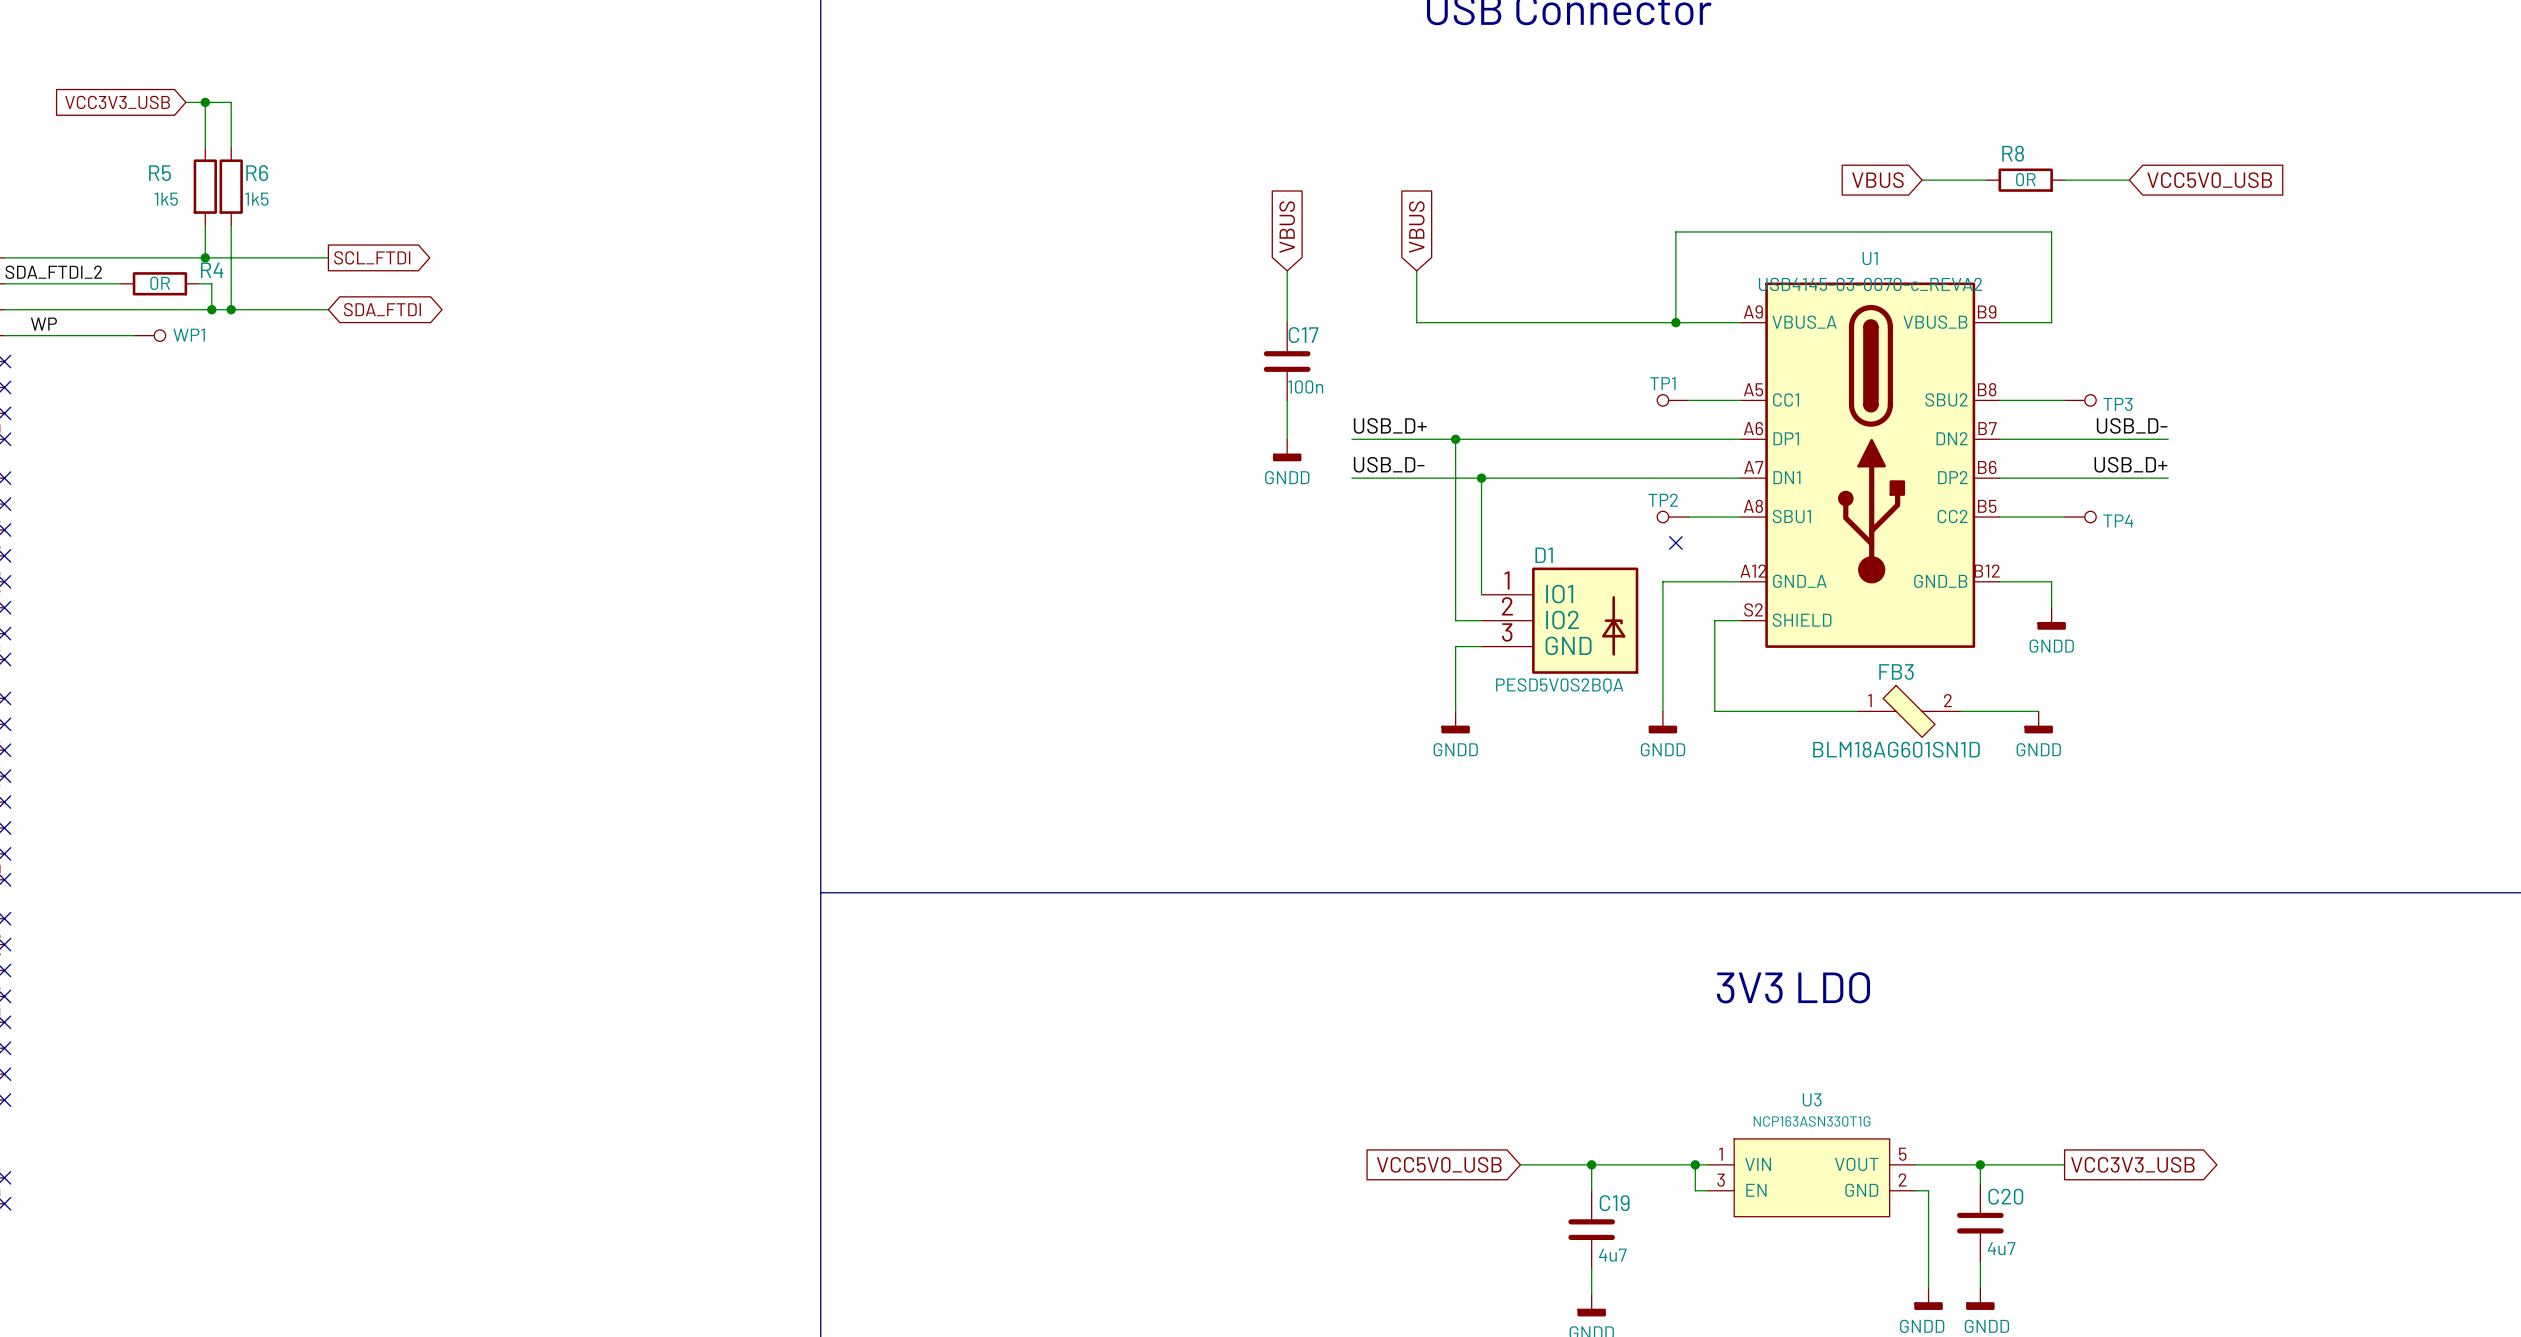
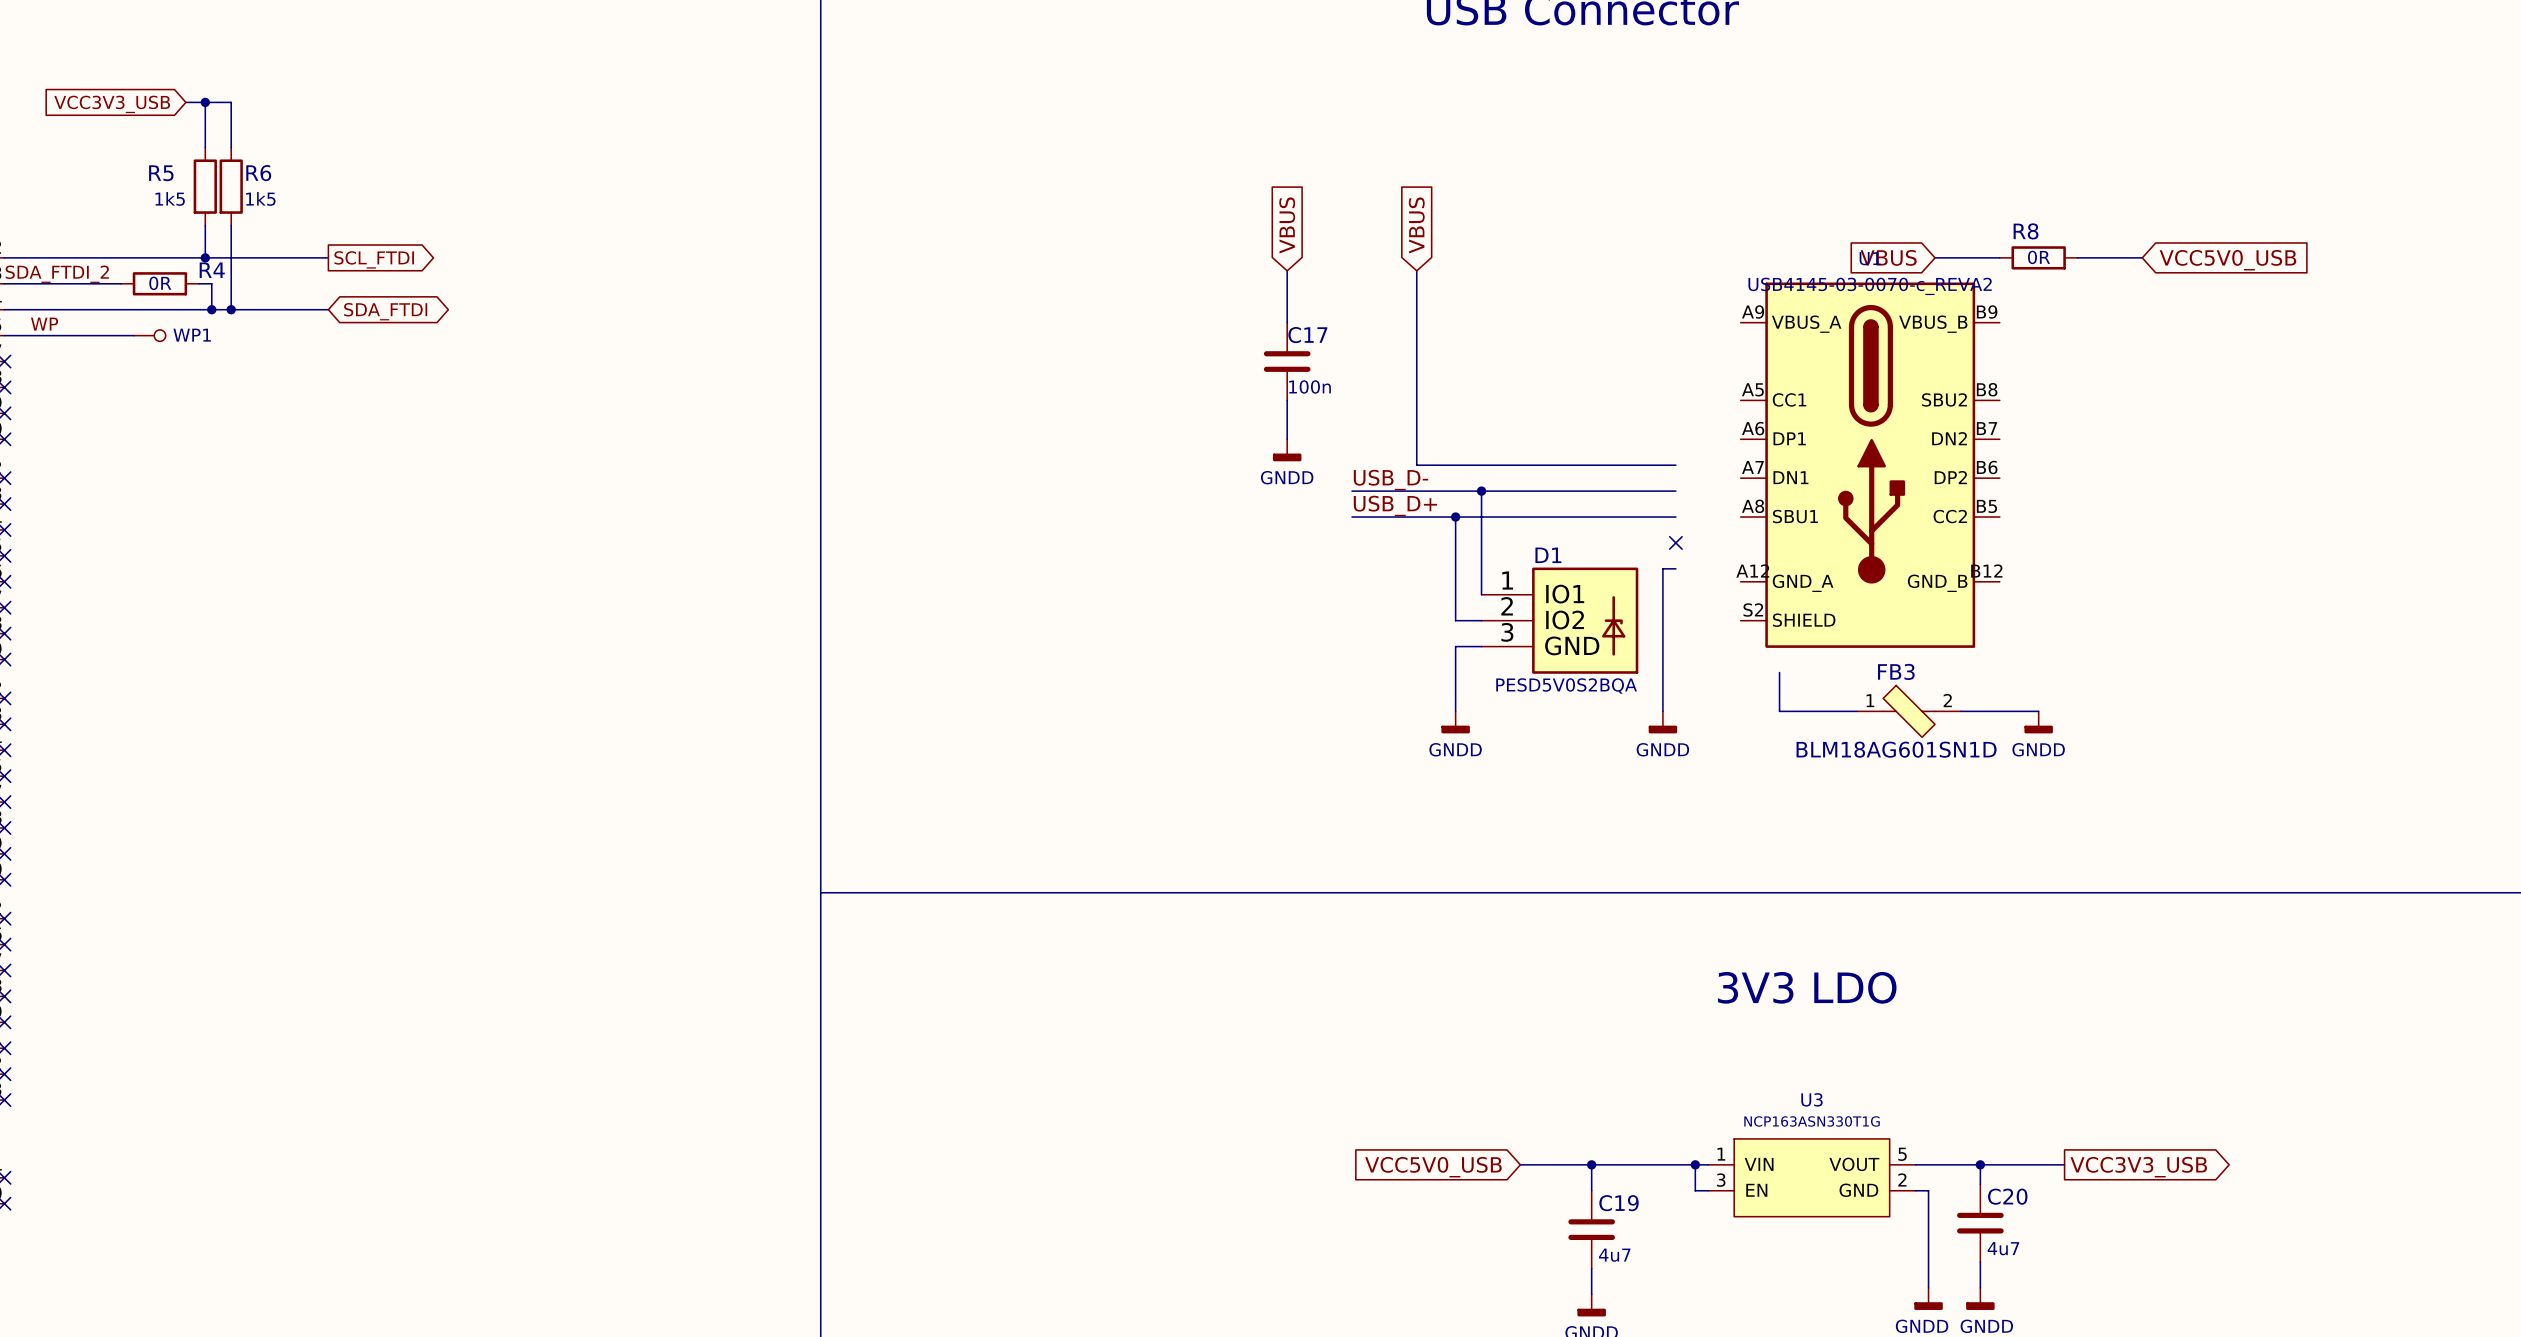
global label position: VBUS (1877, 180) -> VBUS (1888, 257)
wire: (1922, 180) (1986, 180) -> (1935, 257) (1999, 257)
R8 position: (2025, 180) -> (2038, 257)
wire: (2064, 180) (2129, 180) -> (2077, 257) (2142, 257)
global label position: VCC5V0_USB (2209, 180) -> VCC5V0_USB (2227, 260)
wire: (1416, 322) (1740, 322) -> (1416, 322) (1416, 465) (1675, 465)
wire: (1675, 322) (1675, 231) (2051, 231) (2051, 322) (1999, 322) -> none
junction: (1675, 322) -> none
TP1: (1673, 400) -> none
wire: (1688, 400) (1740, 400) -> none
wire: (1999, 400) (2064, 400) -> none
TP3: (2080, 400) -> none
label position: USB_D+ (1390, 425) -> USB_D+ (1395, 505)
label: USB_D- (2132, 425) -> none
wire: (1351, 439) (1740, 439) -> none
wire: (1455, 439) (1455, 517) -> none
junction: (1455, 439) -> none
wire: (1999, 439) (2168, 439) -> none
label position: USB_D- (1389, 464) -> USB_D- (1390, 480)
label: USB_D+ (2130, 464) -> none
wire: (1351, 478) (1740, 478) -> none
wire: (1481, 478) (1481, 491) -> none
junction position: (1481, 478) -> (1481, 491)
wire: (1999, 478) (2168, 478) -> none
wire: none -> (1351, 491) (1675, 491)
wire: none -> (1351, 517) (1675, 517)
junction: none -> (1455, 517)
TP2: (1673, 517) -> none
wire: (1688, 517) (1740, 517) -> none
wire: (1999, 517) (2064, 517) -> none
TP4: (2080, 517) -> none
wire: (1662, 581) (1740, 581) -> (1662, 581) (1662, 568) (1675, 568)
wire: (1999, 581) (2051, 581) (2051, 607) -> none
power symbol: GNDD (2051, 618) -> none
wire: (1740, 620) (1714, 620) (1714, 711) (1779, 711) -> (1779, 672) (1779, 711)

